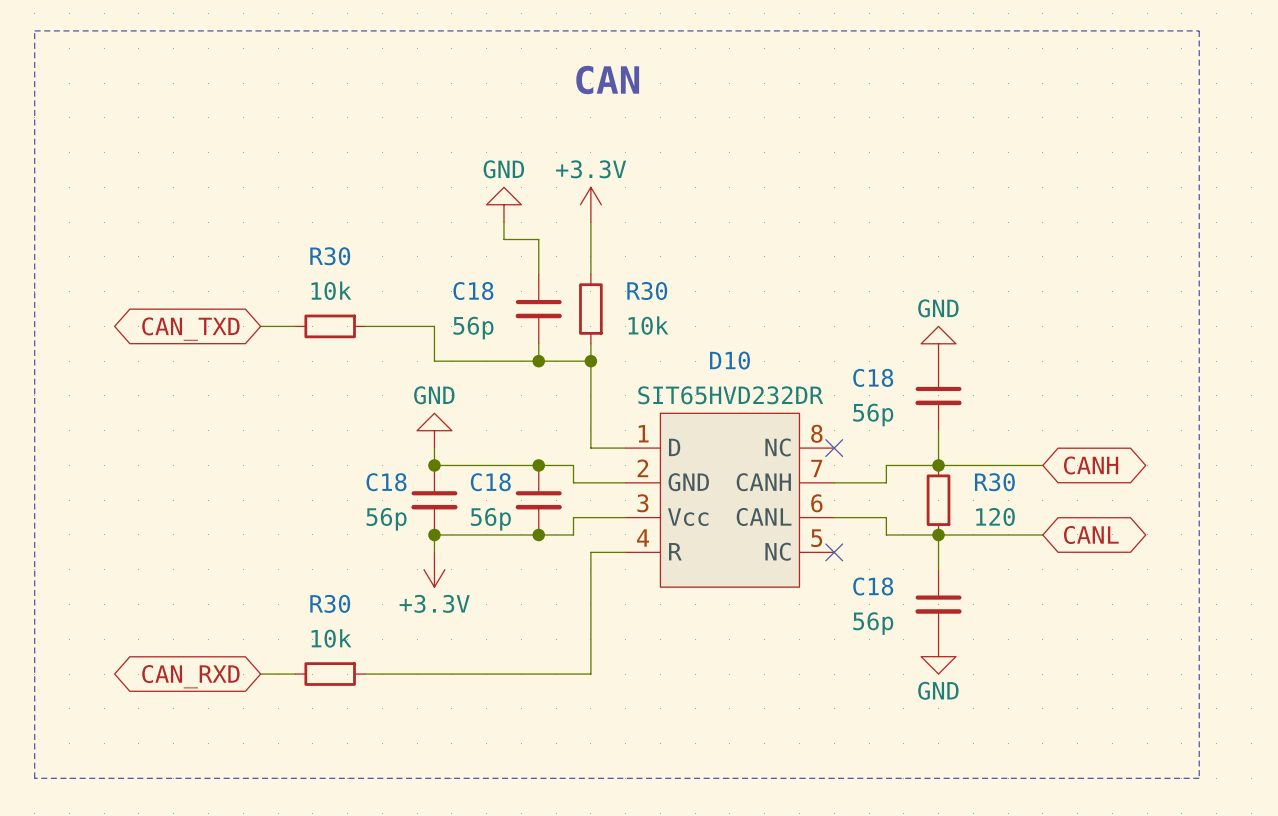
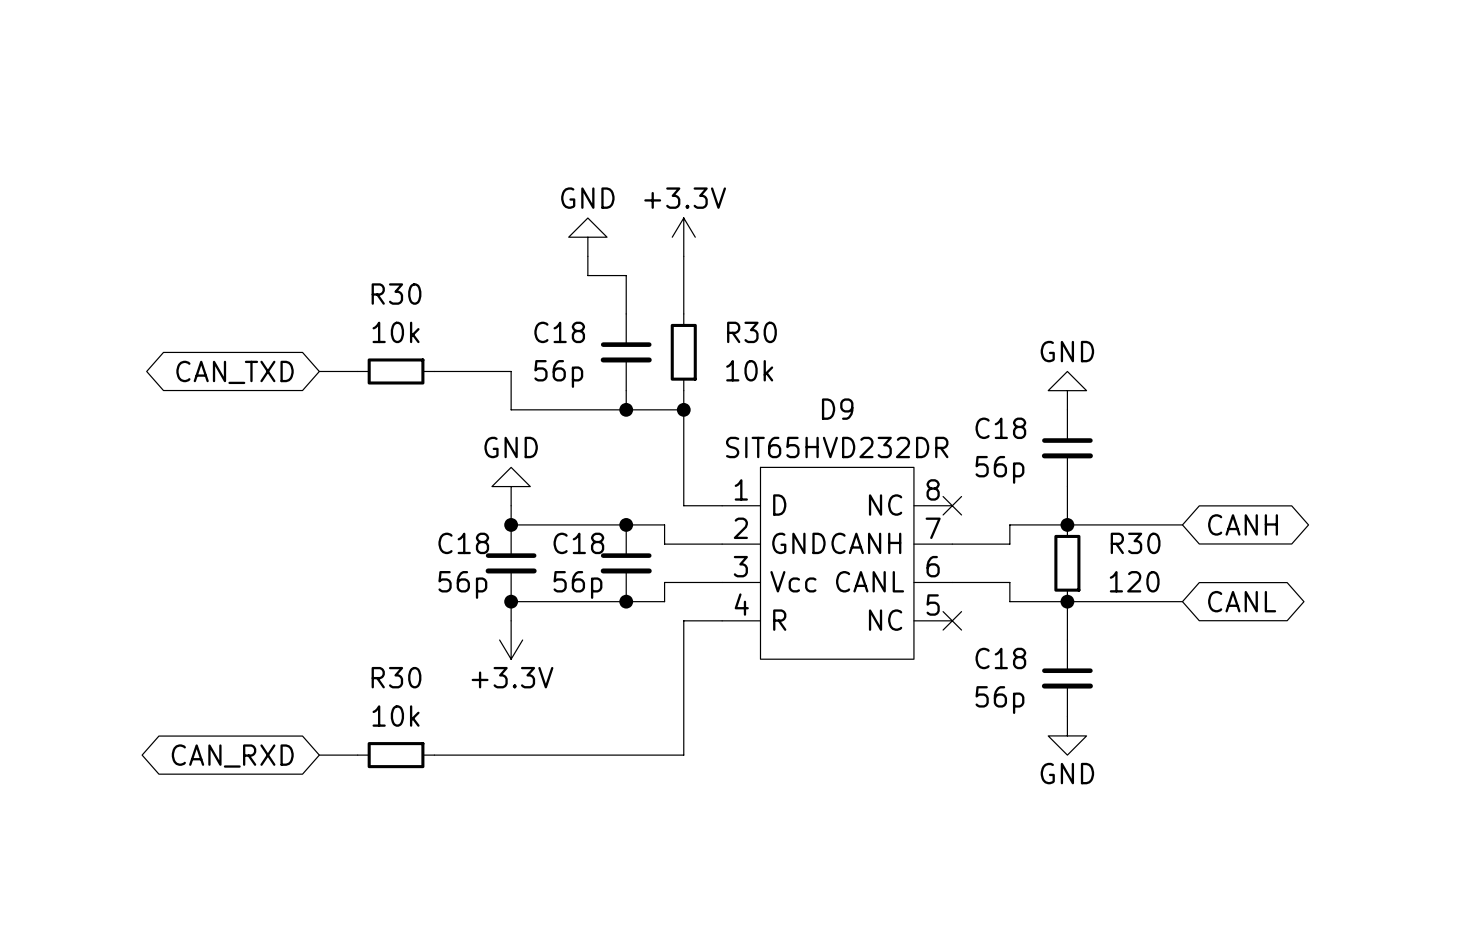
line: (34, 30) (1199, 30) (1199, 778) (34, 778) (34, 30) -> none
text: CAN (607, 80) -> none
D10 name: D10 (729, 360) -> D9 (837, 409)

